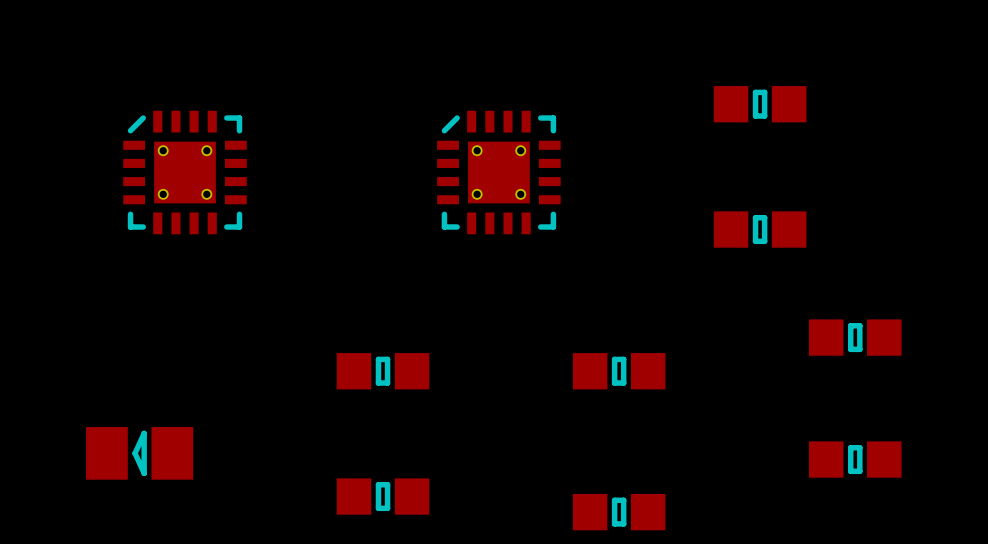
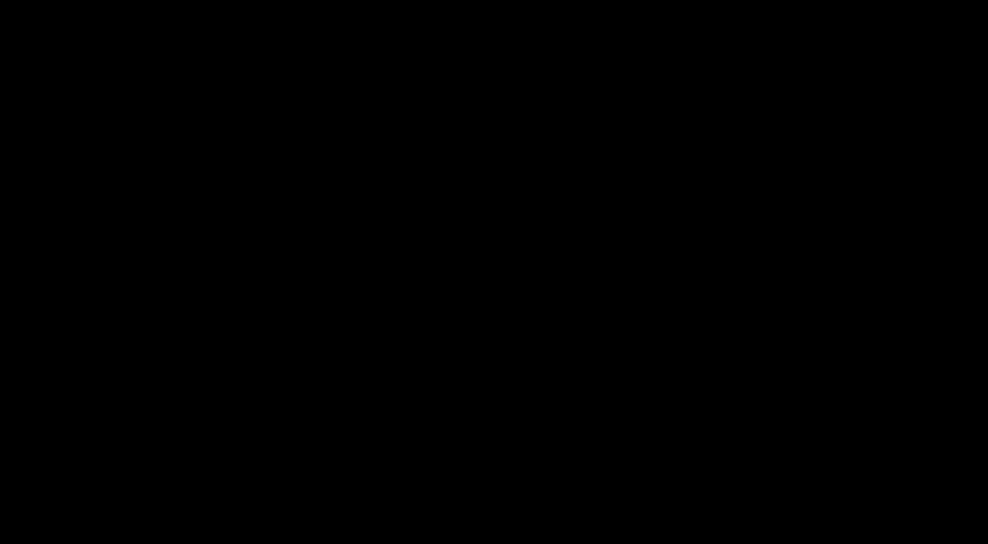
part: (760, 104) -> none
part: (185, 172) -> none
part: (498, 172) -> none
part: (760, 229) -> none
part: (855, 337) -> none
part: (383, 371) -> none
part: (619, 371) -> none
part: (139, 453) -> none
part: (855, 459) -> none
part: (383, 496) -> none
part: (619, 512) -> none

